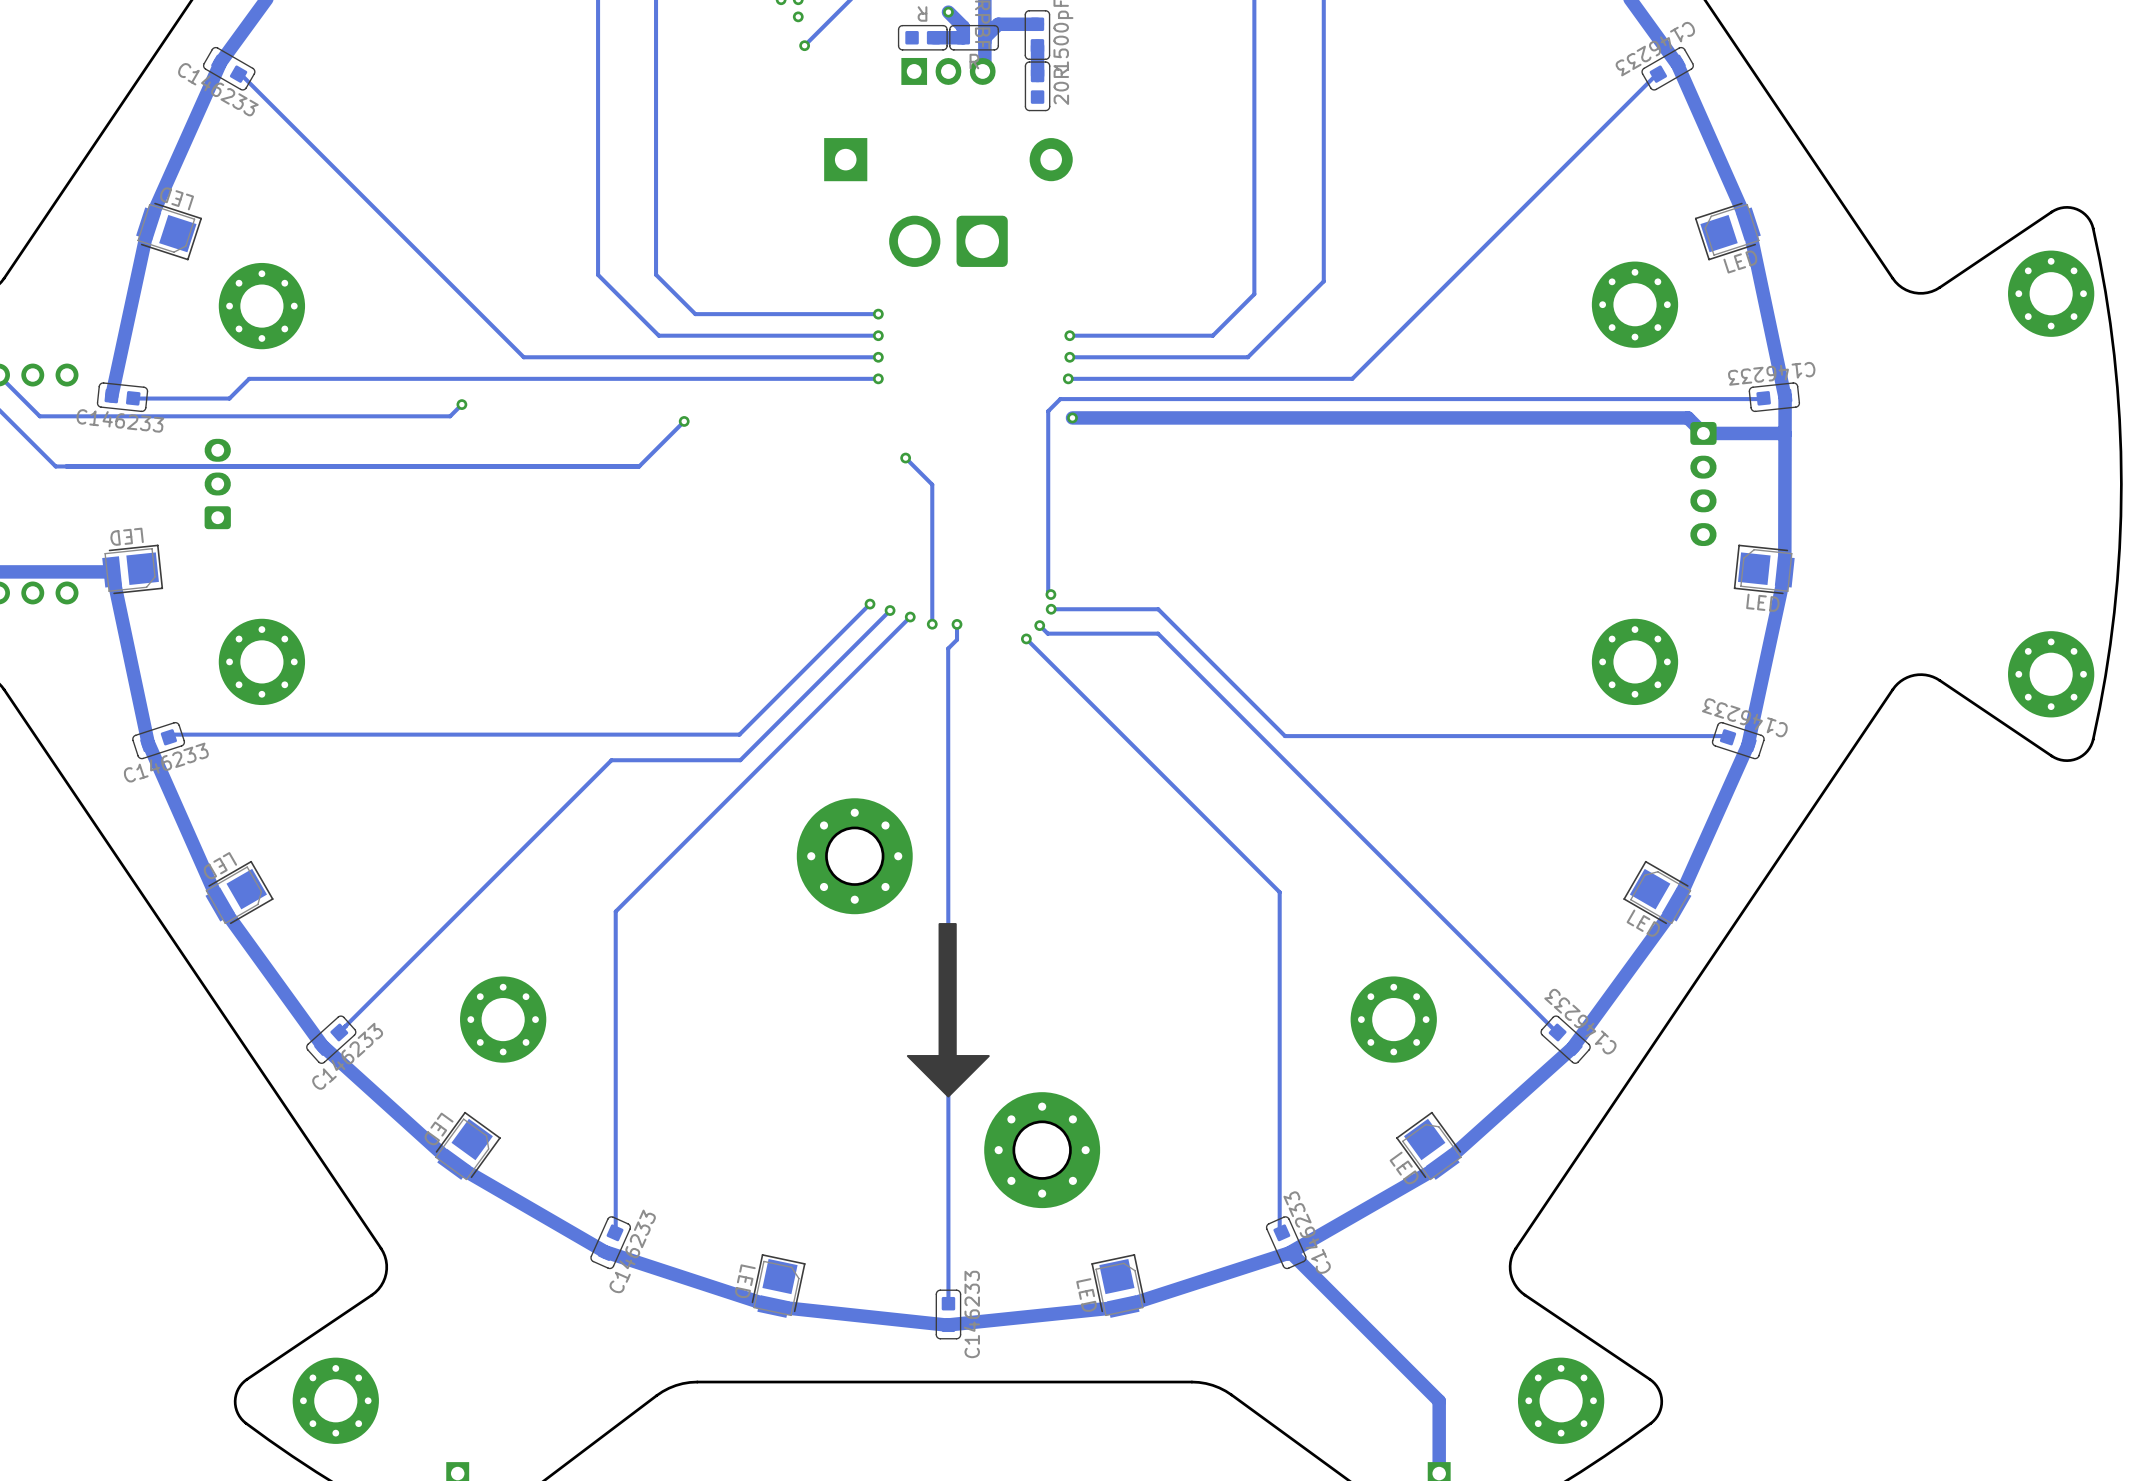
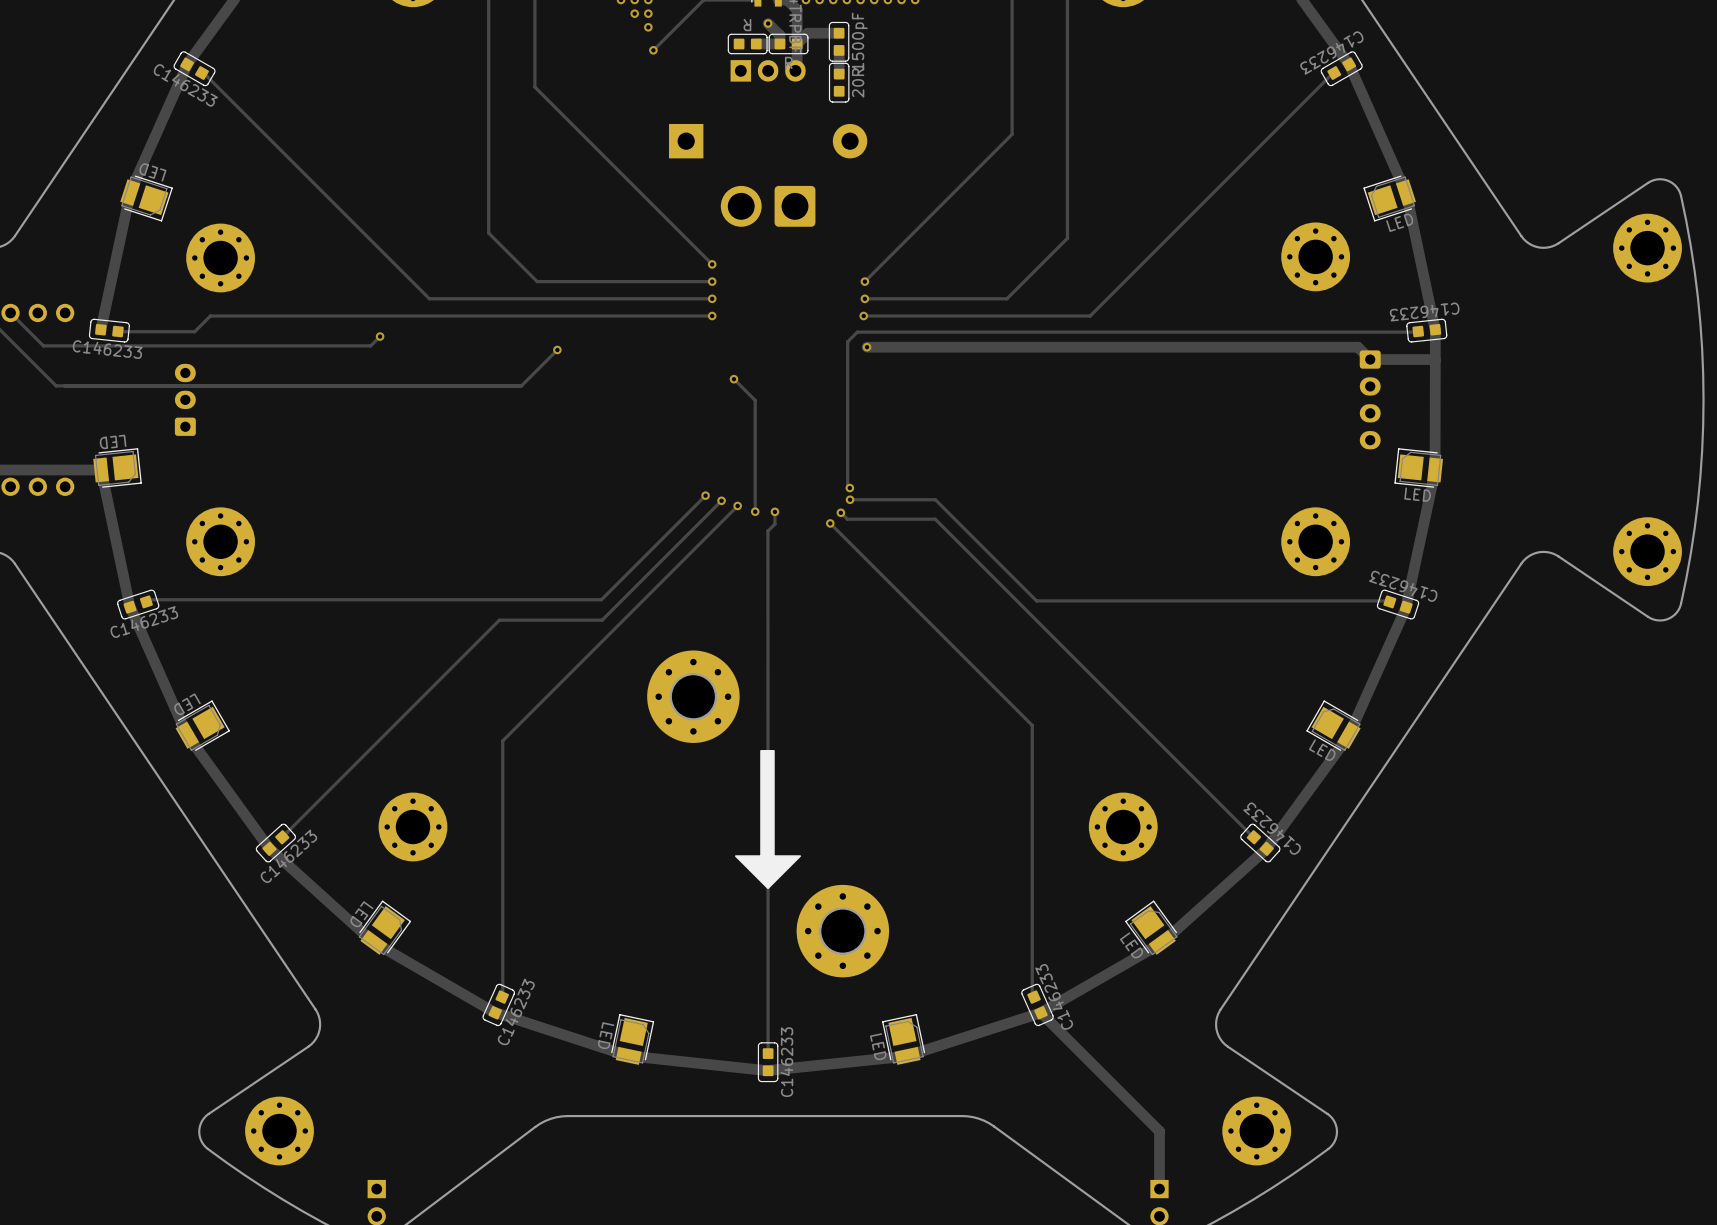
track: (656, 91) (656, 274) (695, 314) (878, 314) -> (534, 87) (712, 264)
track: (1254, 151) (1254, 294) (1212, 335) (1069, 335) -> (1012, 134) (864, 281)

